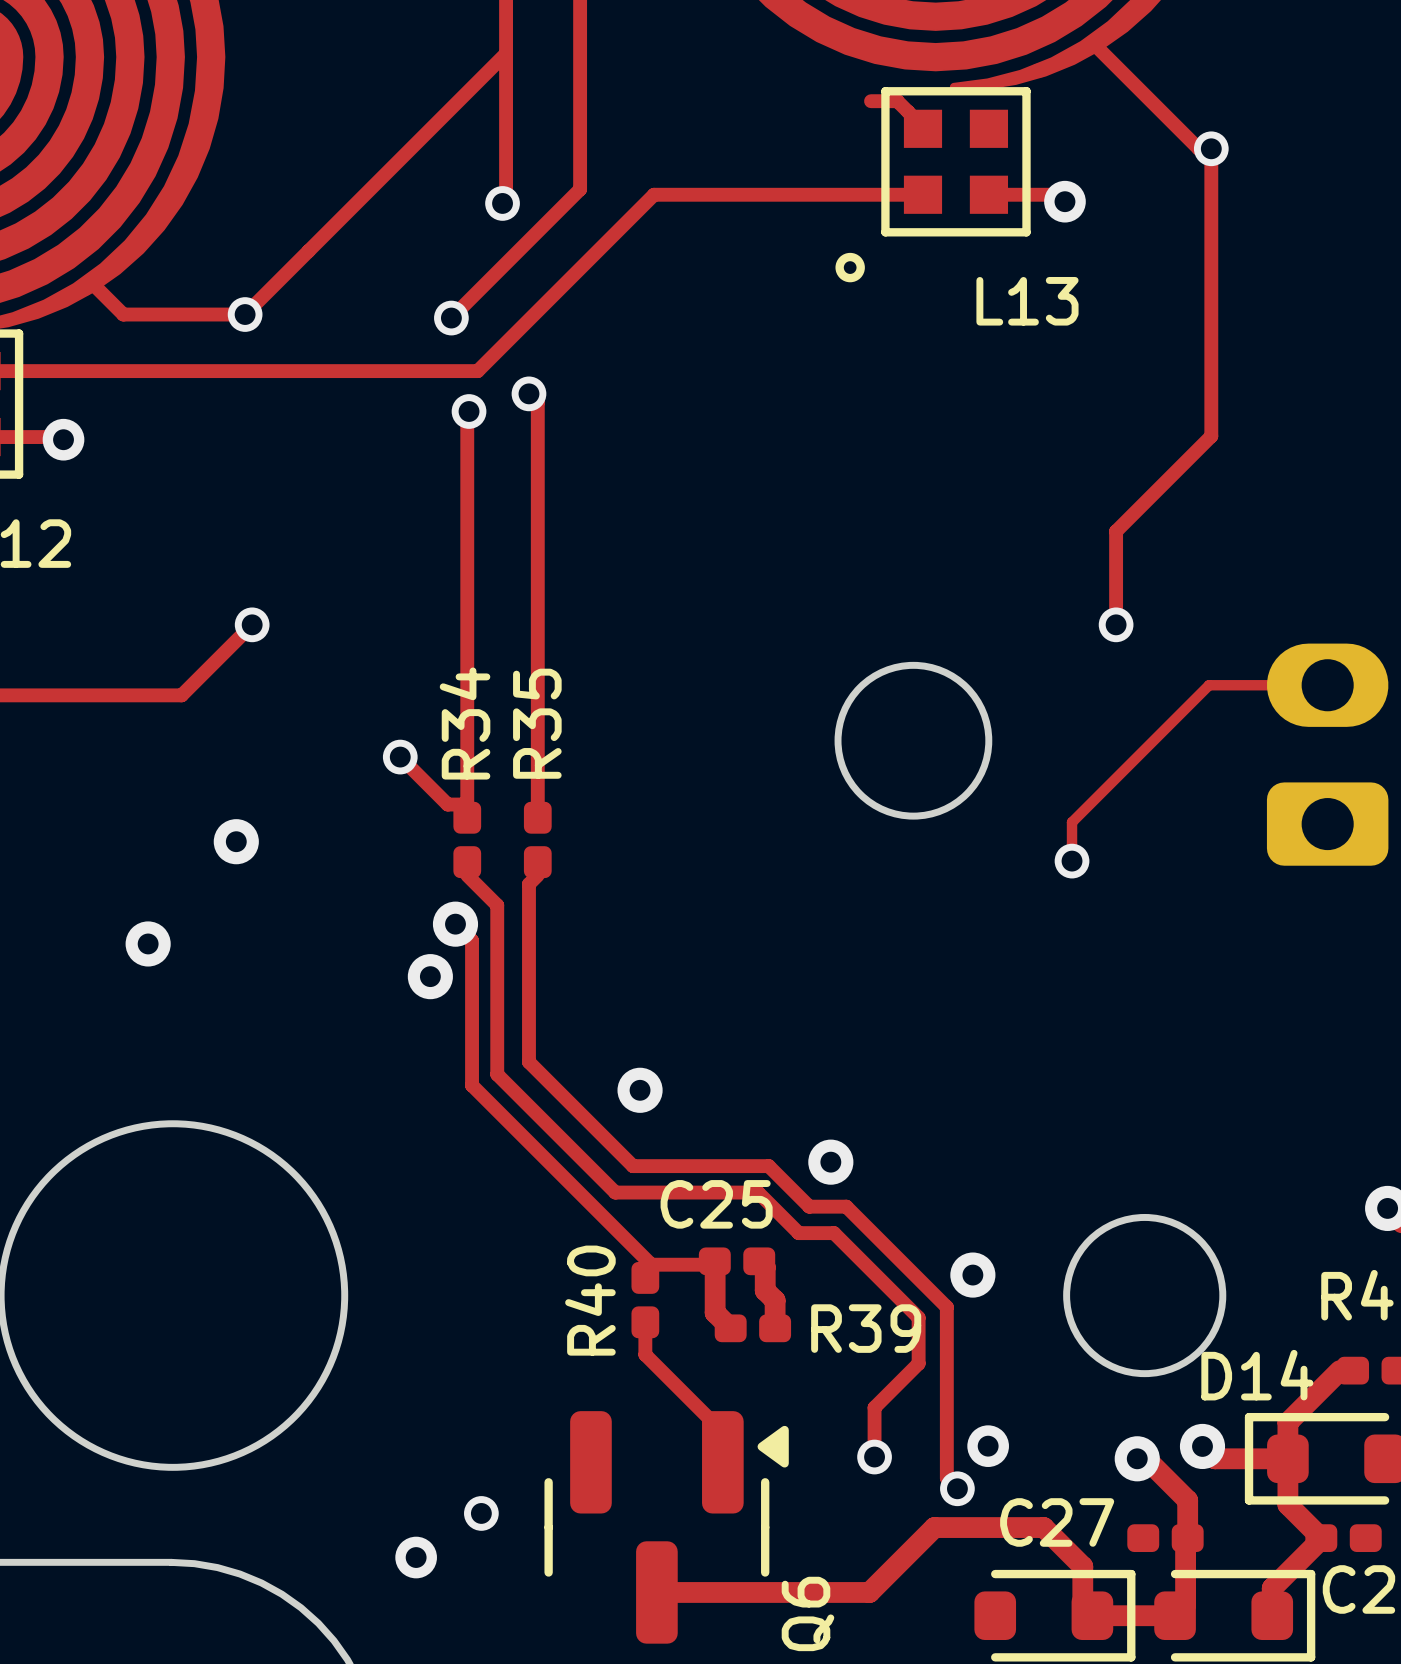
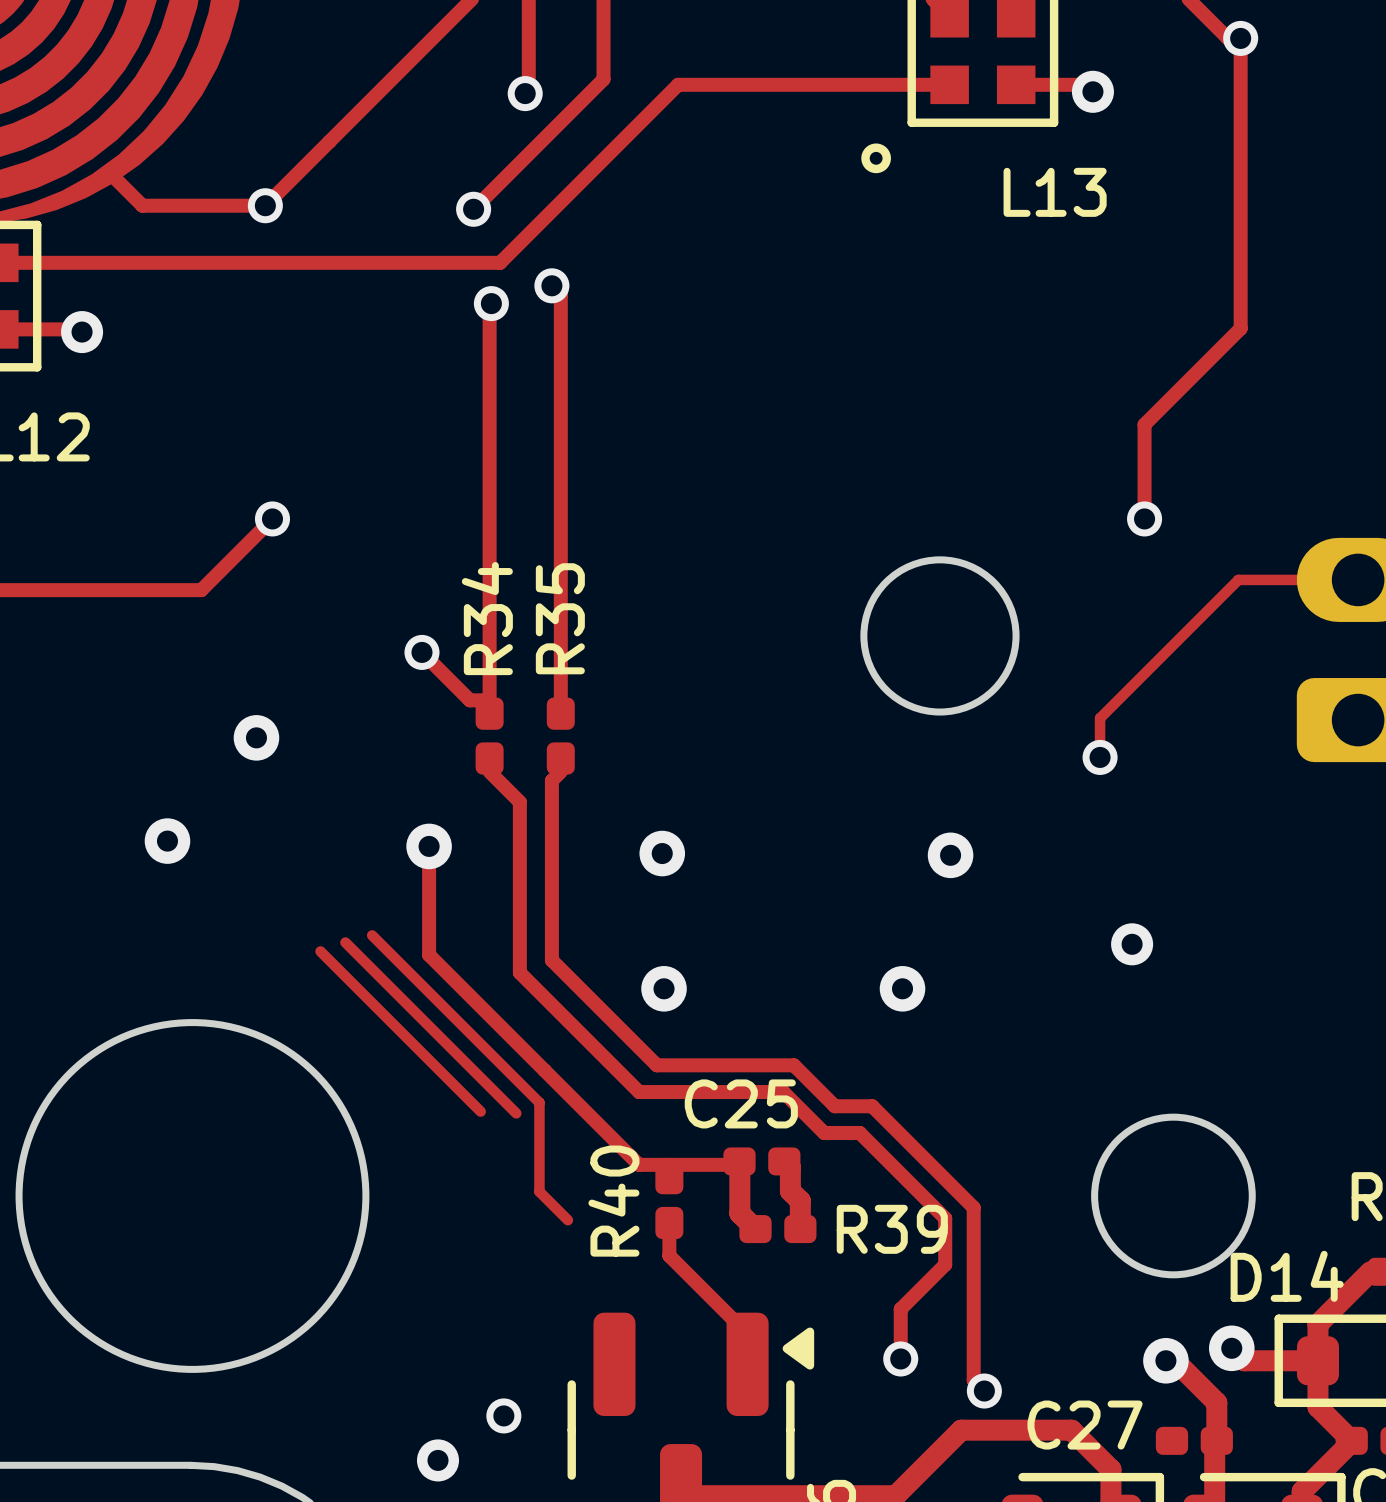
track: (455, 924) (472, 940) (472, 1085) (651, 1264) -> (429, 846) (429, 954) (638, 1164) (675, 1164)
via: (455, 924) -> none
via: none -> (662, 853)
via: none -> (950, 855)
via position: (430, 976) -> (429, 846)
track: none -> (372, 935) (539, 1102) (539, 1191) (567, 1220)
track: none -> (345, 942) (516, 1113)
track: none -> (320, 951) (480, 1111)
via position: (830, 1162) -> (902, 988)
via: (972, 1275) -> none
via position: (988, 1446) -> (1132, 944)

